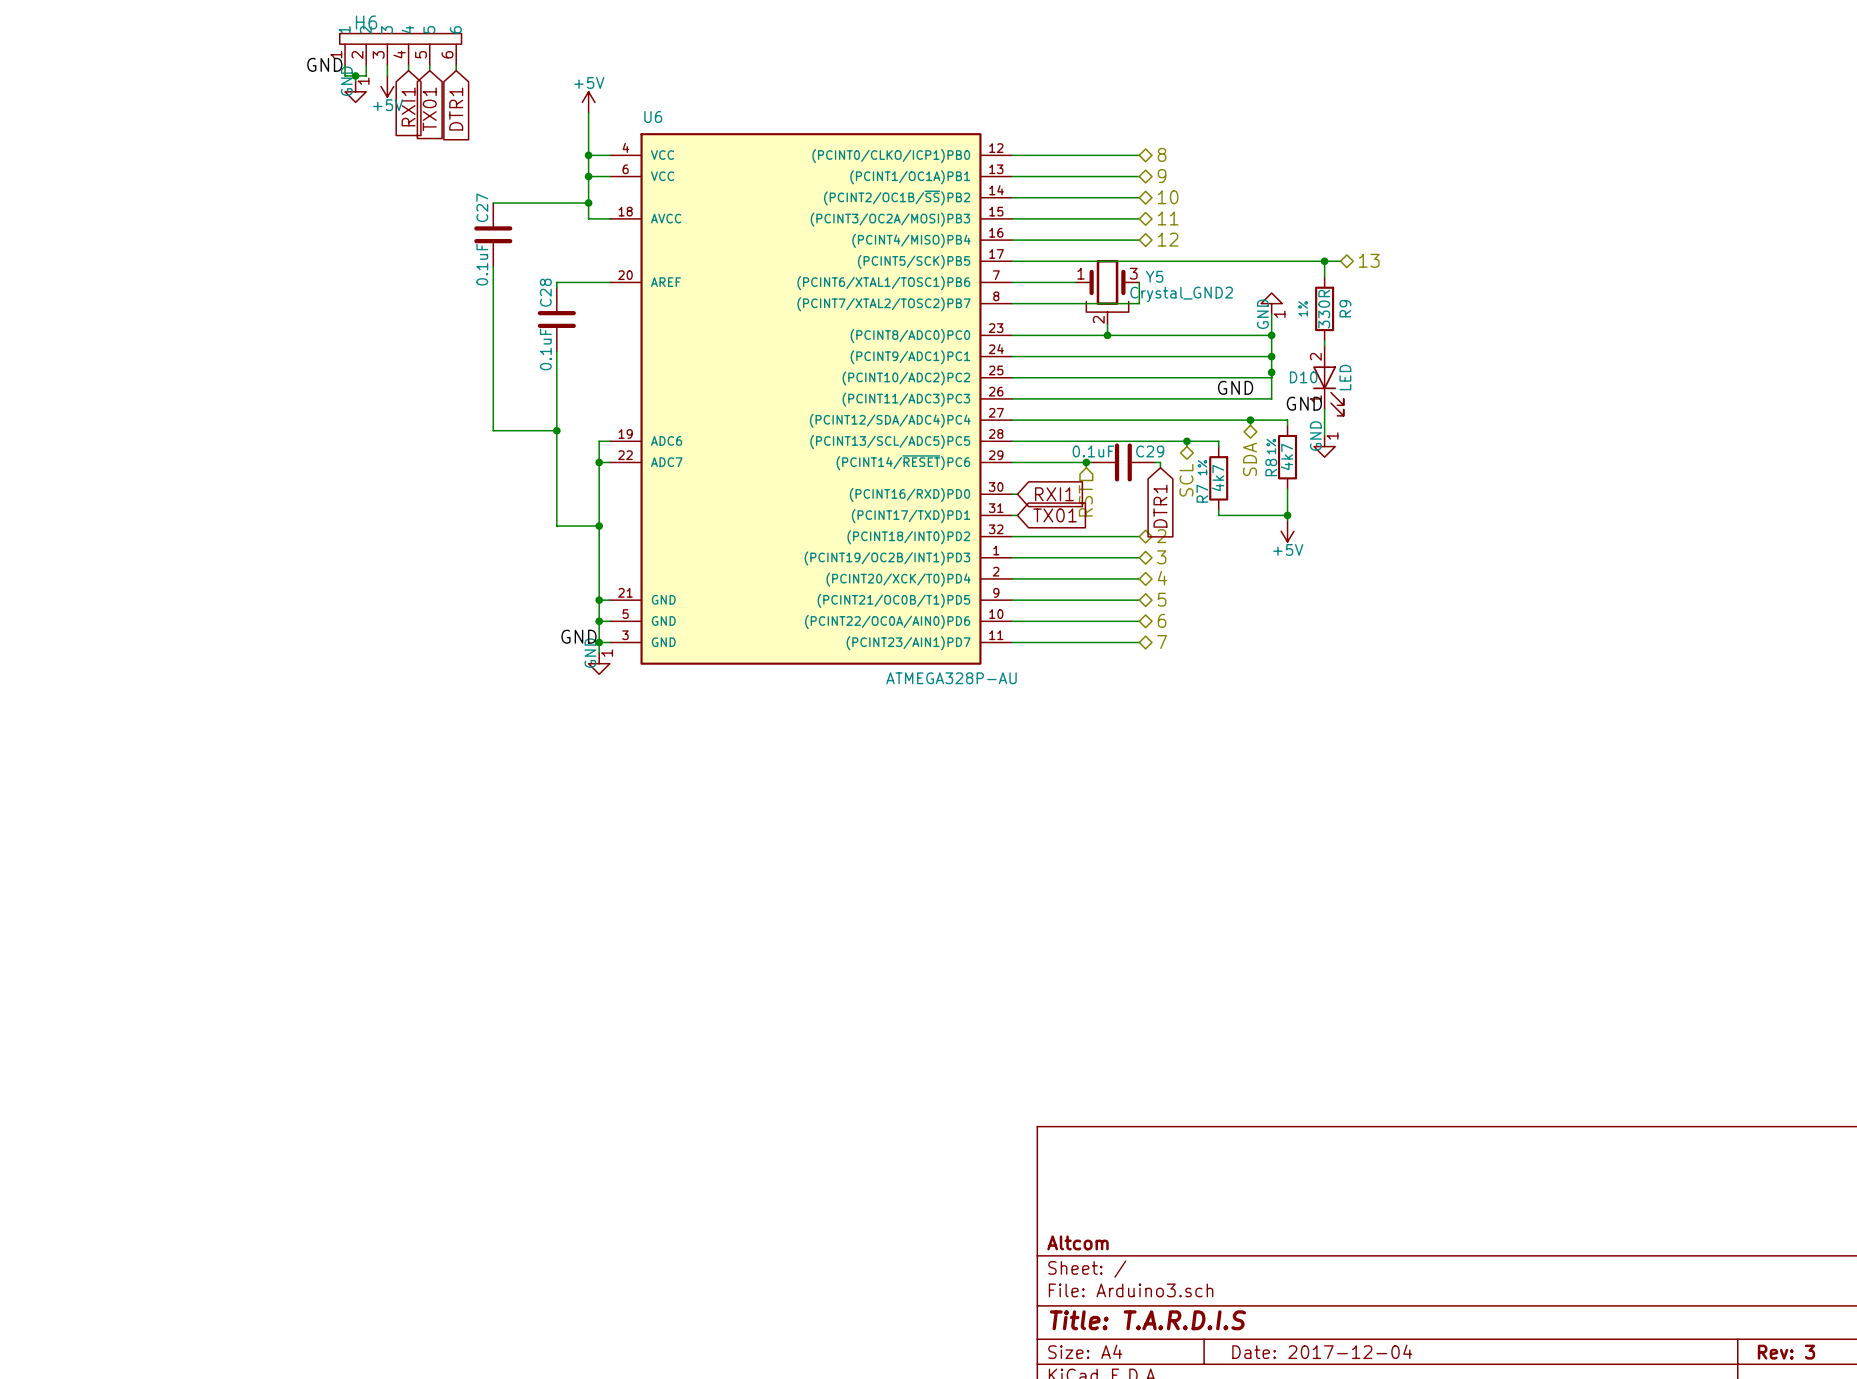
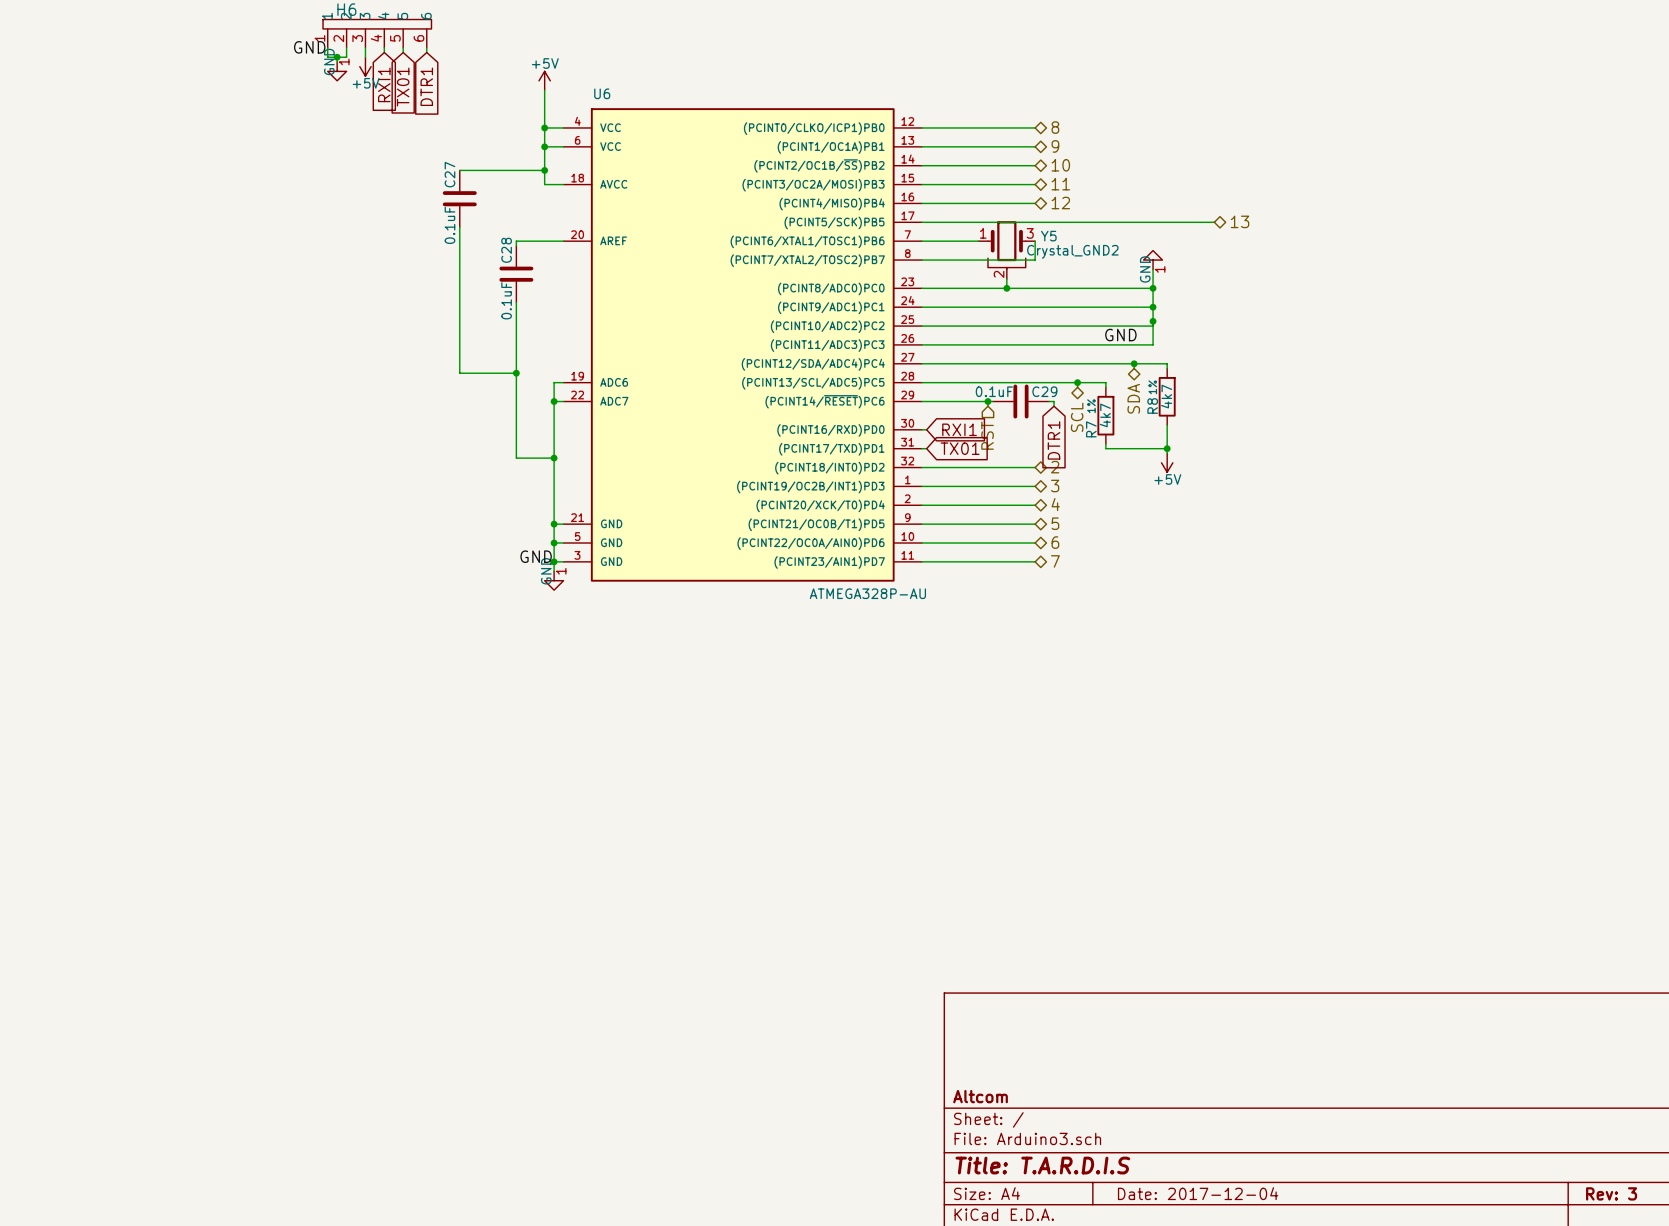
wire: (1324, 261) (1324, 277) -> none
junction: (1324, 261) -> none
R9: 330R (1324, 308) -> none
wire: (1324, 340) (1324, 345) -> none
D10: LED (1328, 380) -> none
label: GND (1304, 403) -> none
wire: (1324, 409) (1324, 435) -> none
power symbol: (1324, 446) -> none

